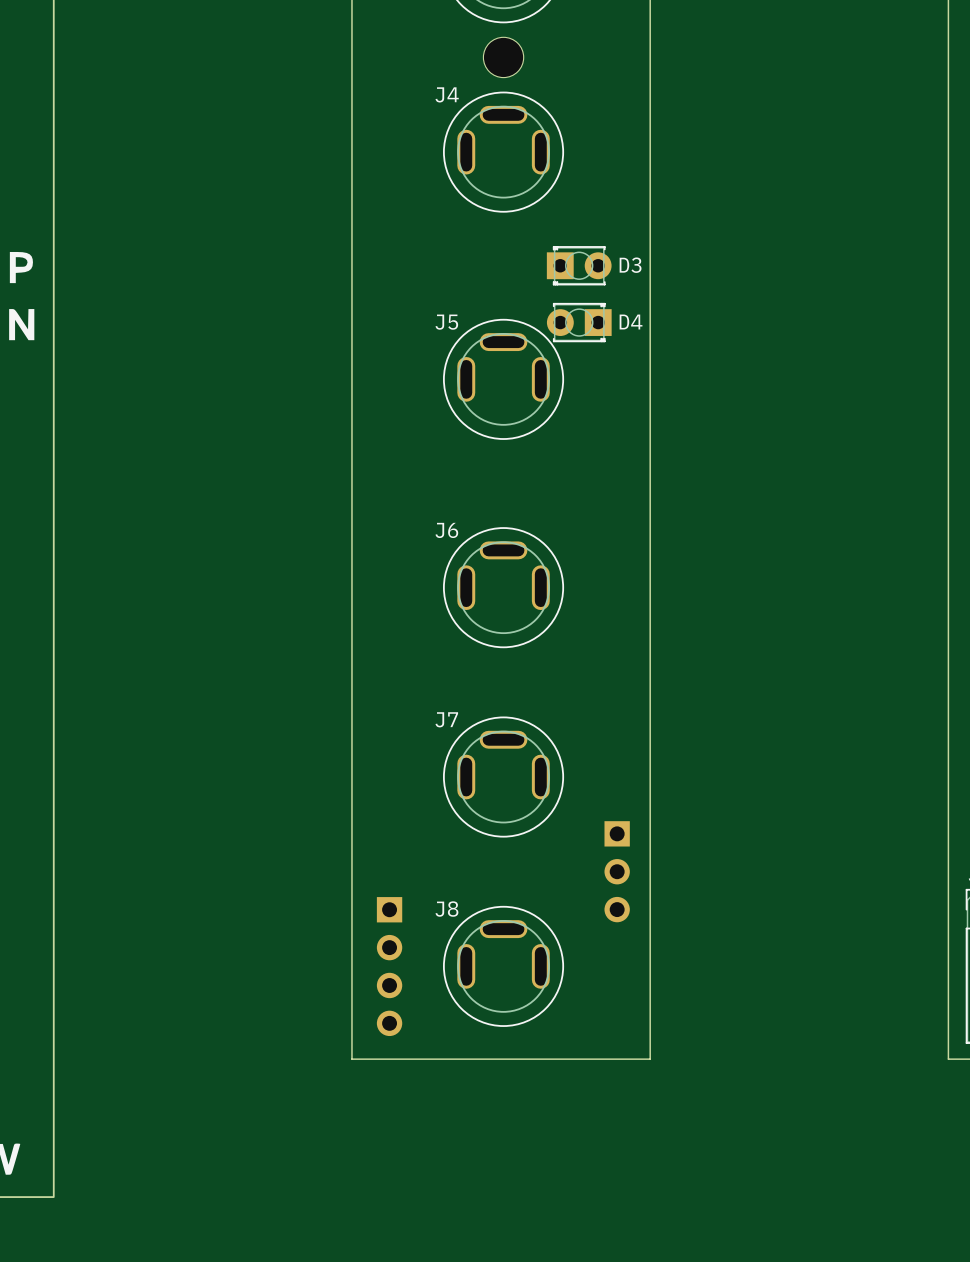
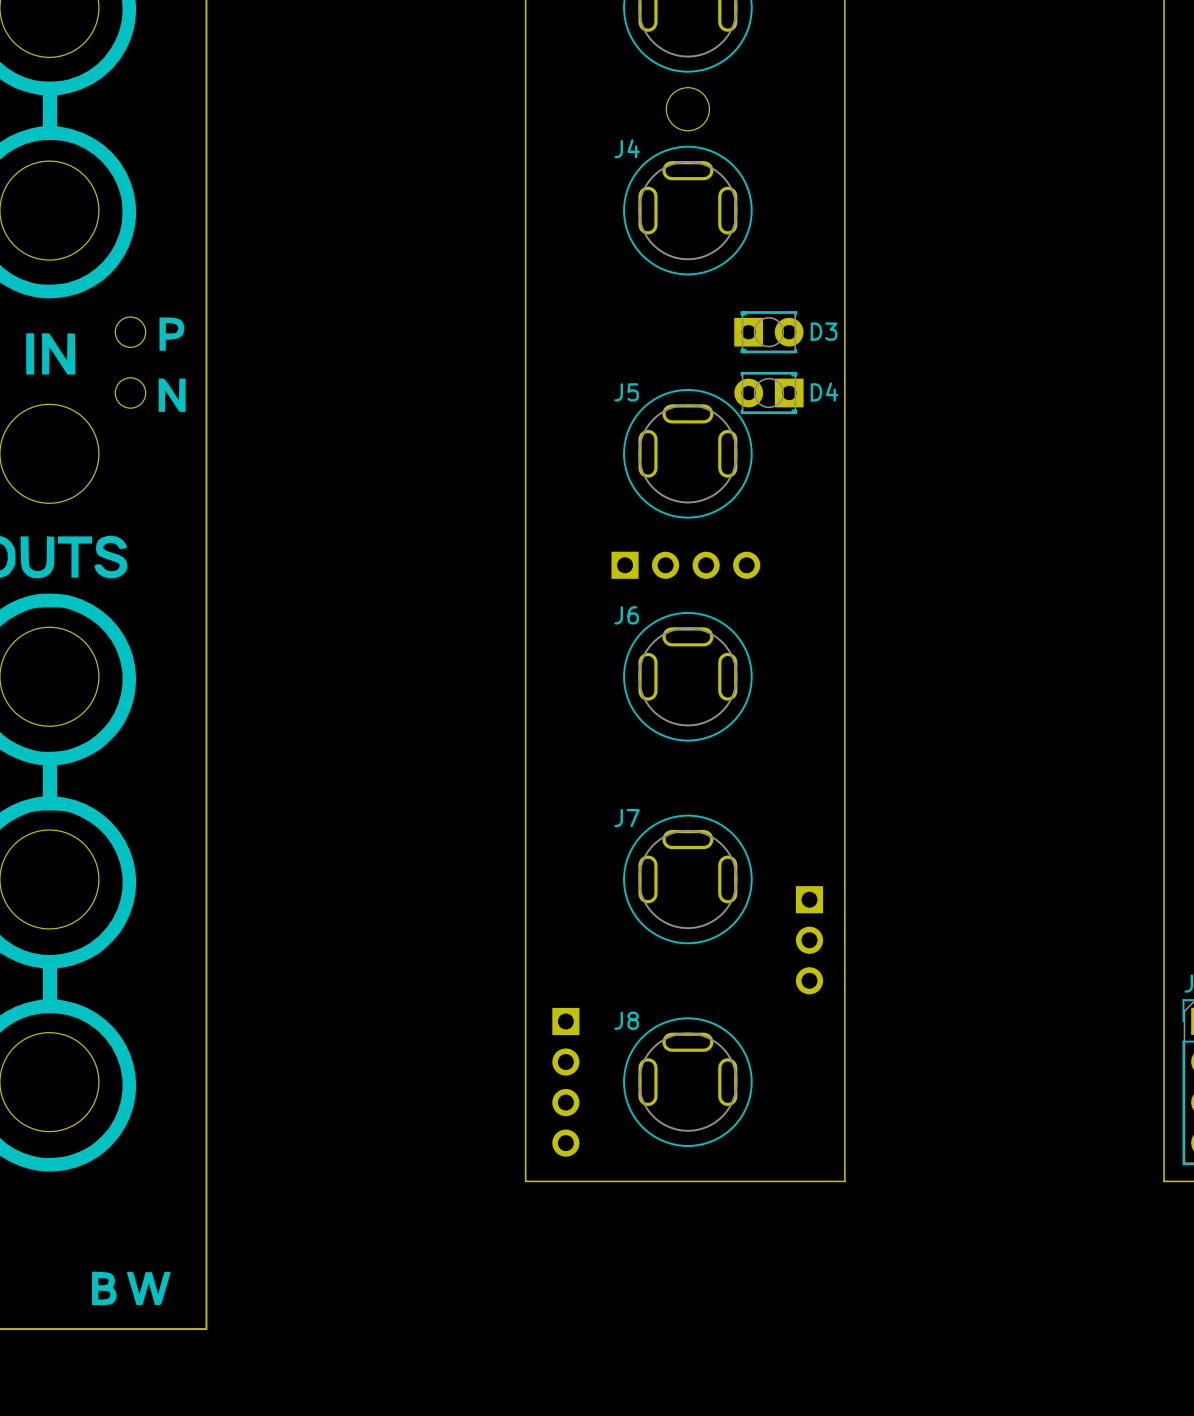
part: none -> (685, 565)
part position: (617, 871) -> (809, 940)

